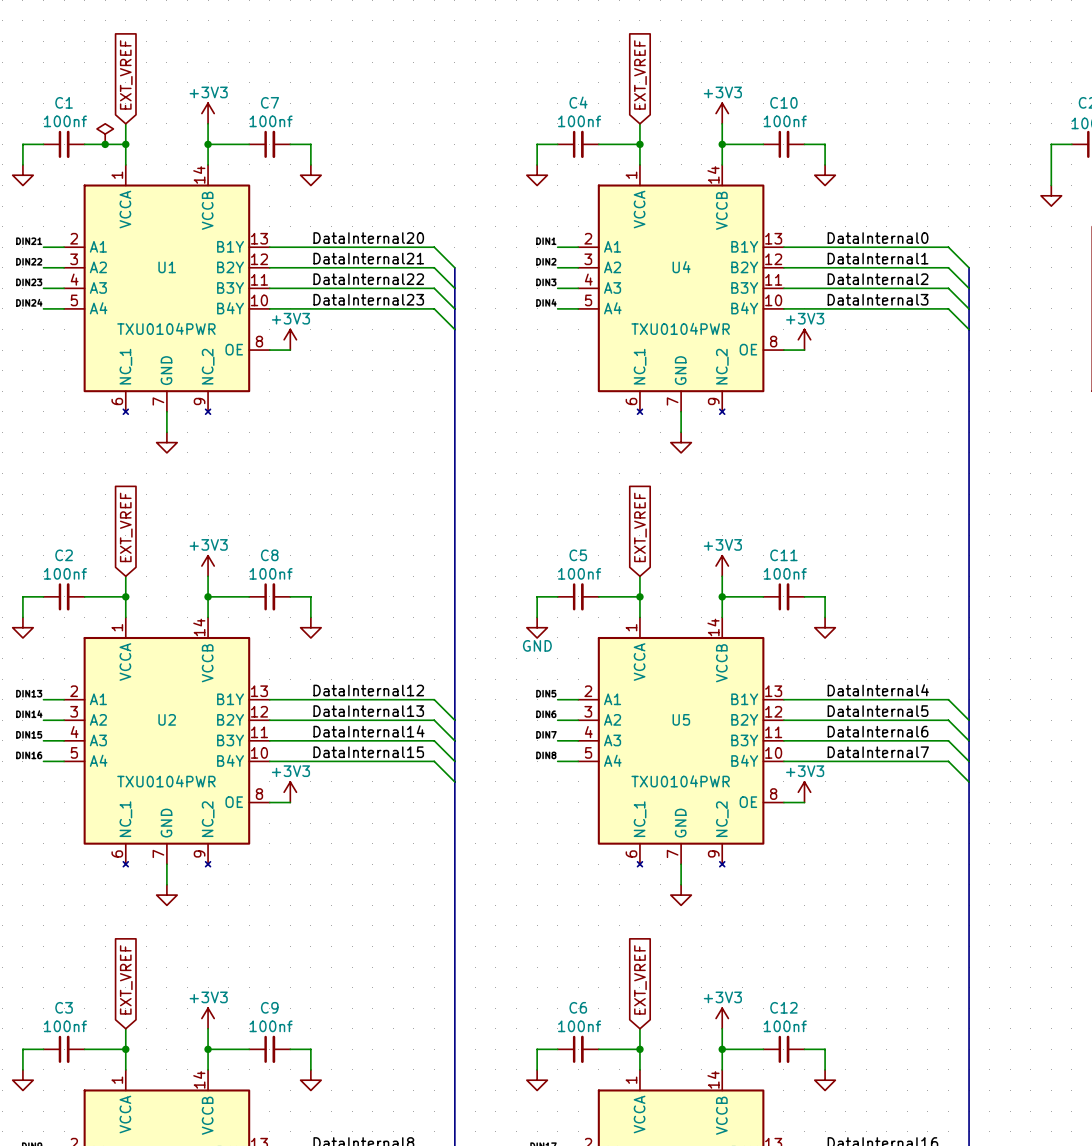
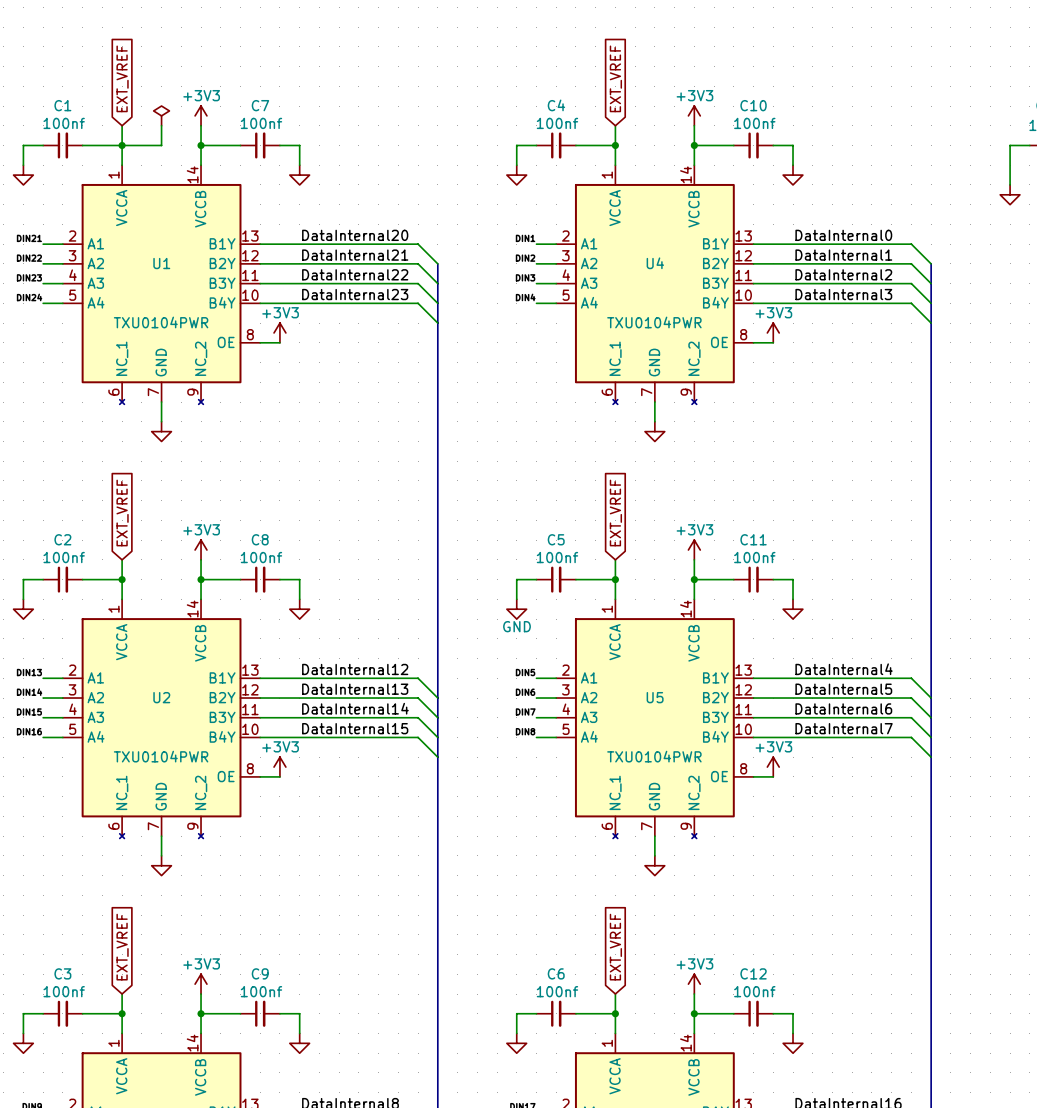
wire: none -> (161, 125) (161, 145) (122, 145)
power symbol position: (105, 134) -> (161, 115)
junction: (105, 144) -> none

